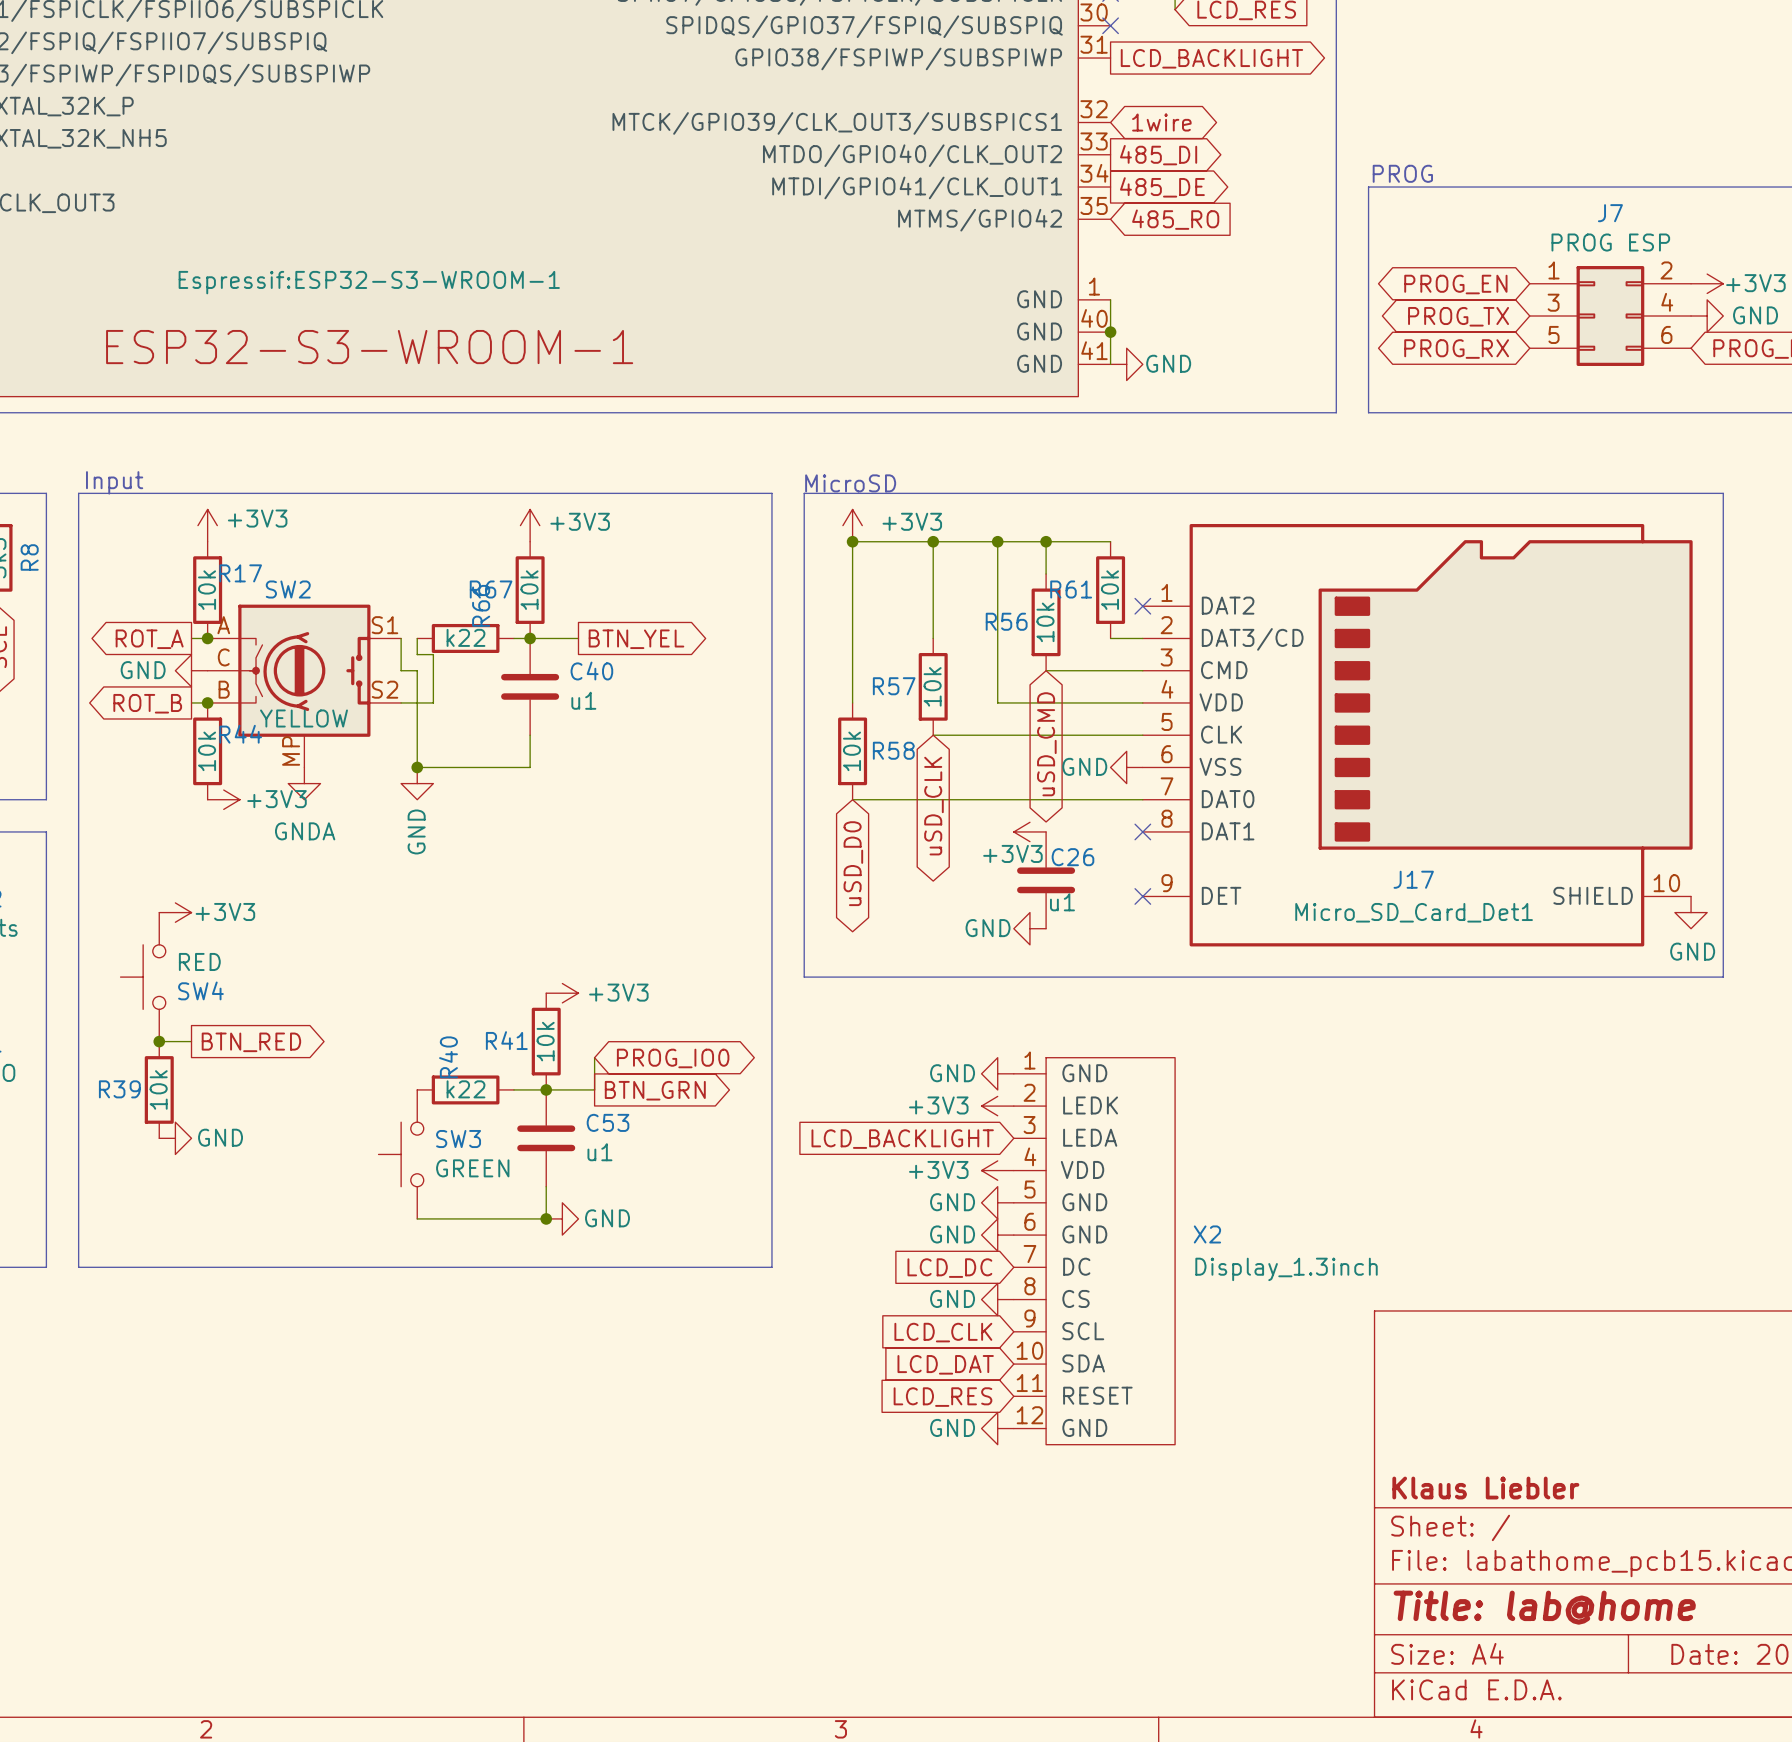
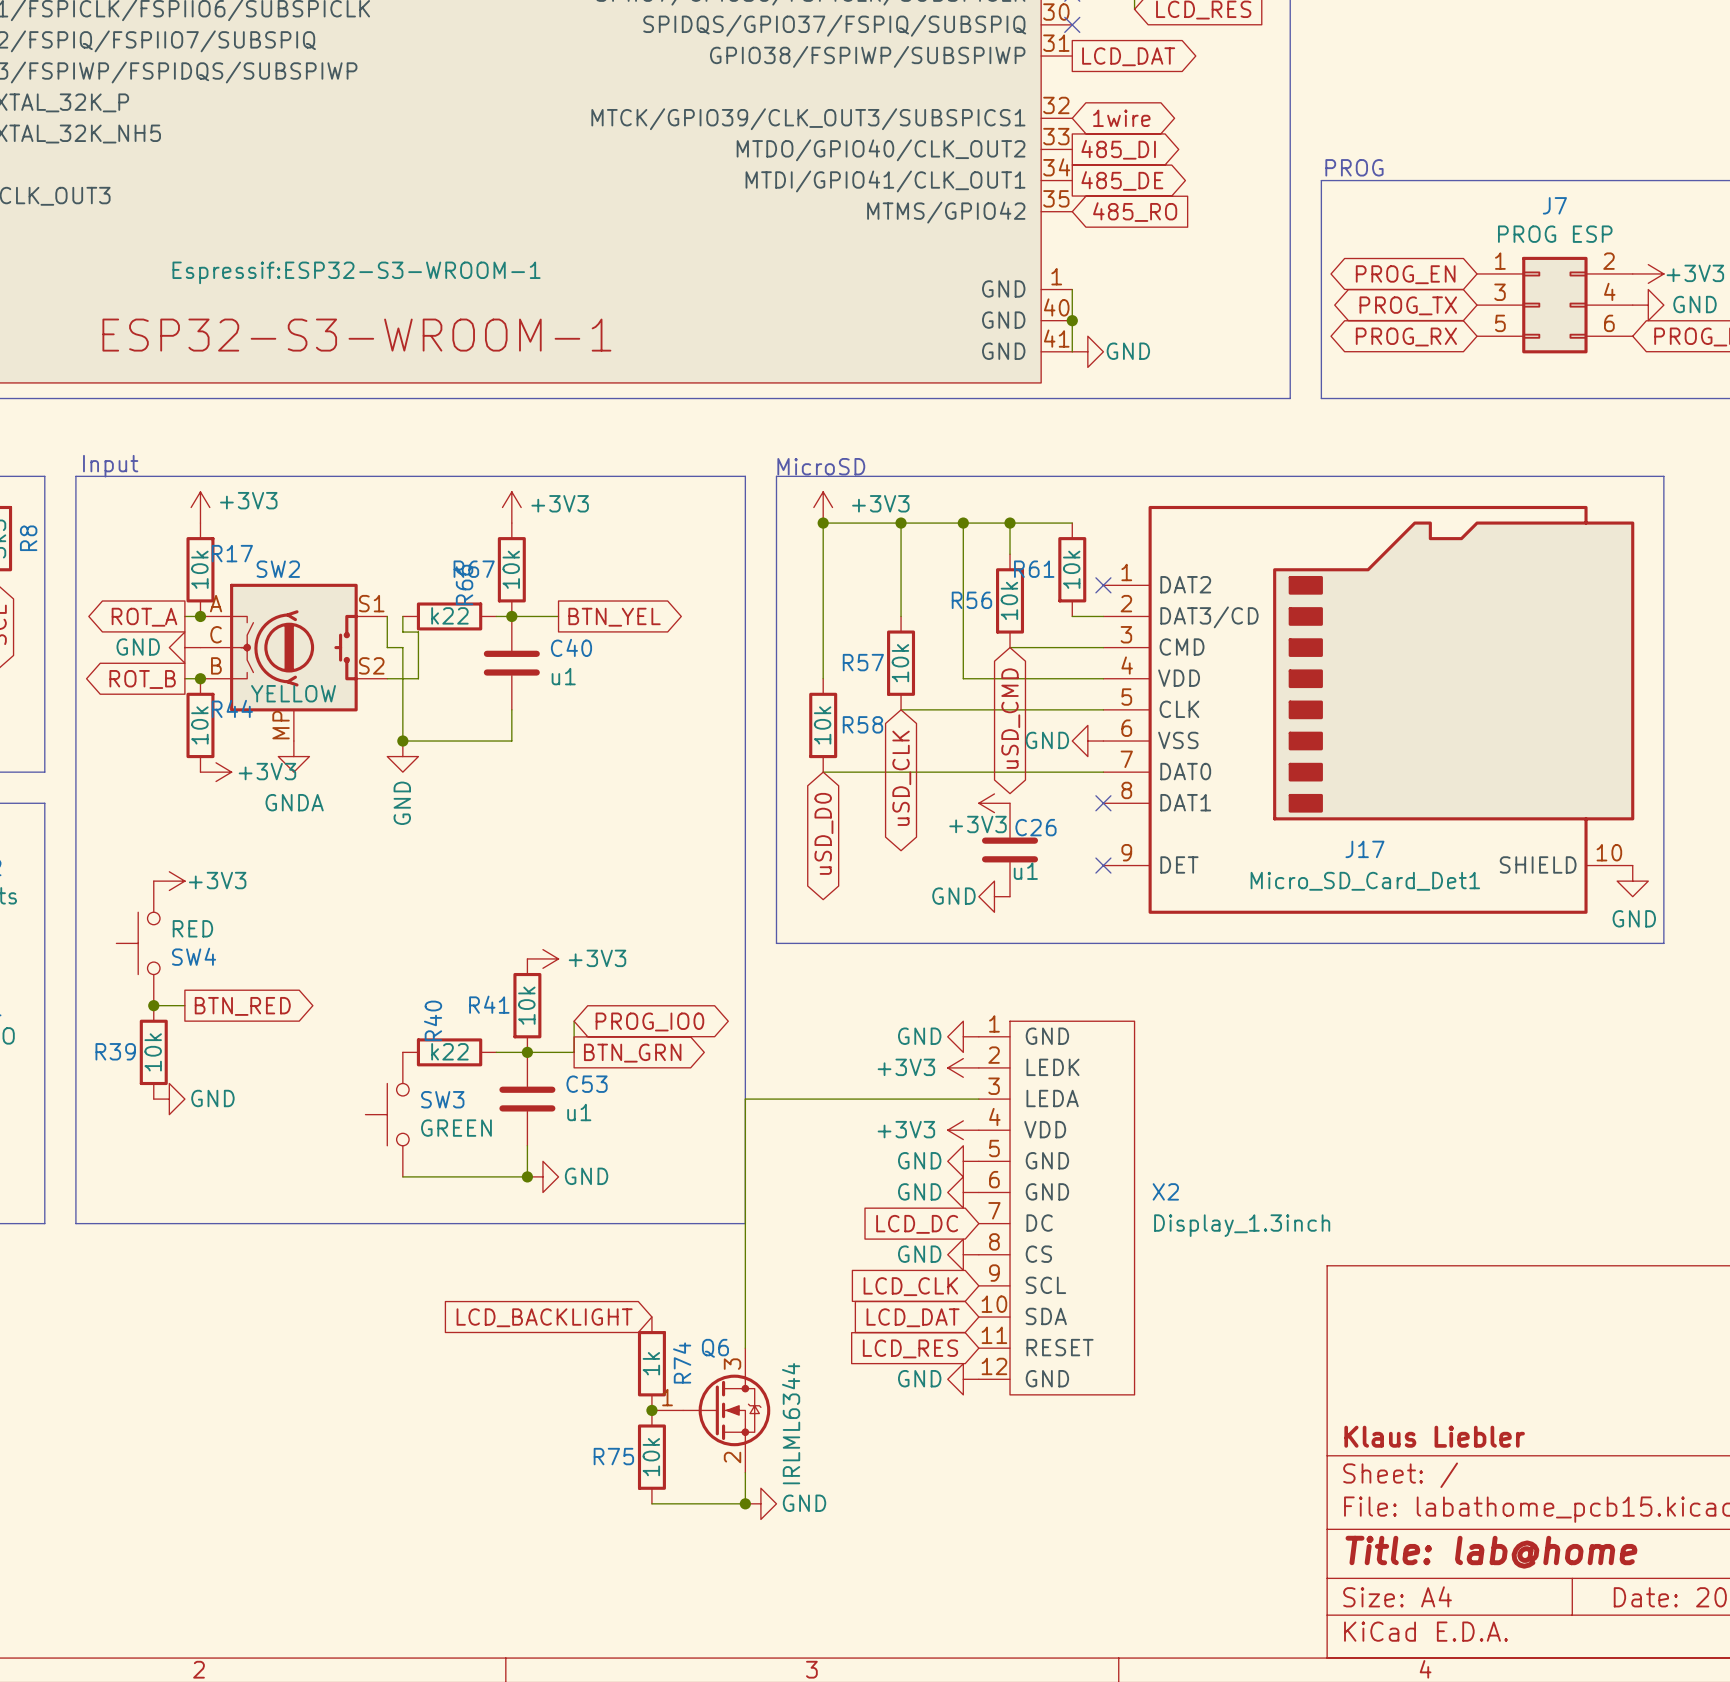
global label: LCD_BACKLIGHT (1211, 58) -> LCD_DAT (1128, 56)
wire: none -> (978, 1099) (745, 1099) (745, 1348)
global label: LCD_BACKLIGHT (902, 1139) -> none
global label: none -> LCD_BACKLIGHT (544, 1317)
R74: none -> 1k (651, 1363)
junction: none -> (651, 1410)
Q6: none -> IRLML6344 (711, 1410)
R75: none -> 10k (651, 1457)
wire: none -> (745, 1472) (745, 1503) (651, 1503)
junction: none -> (745, 1503)
power symbol: none -> GND (760, 1503)

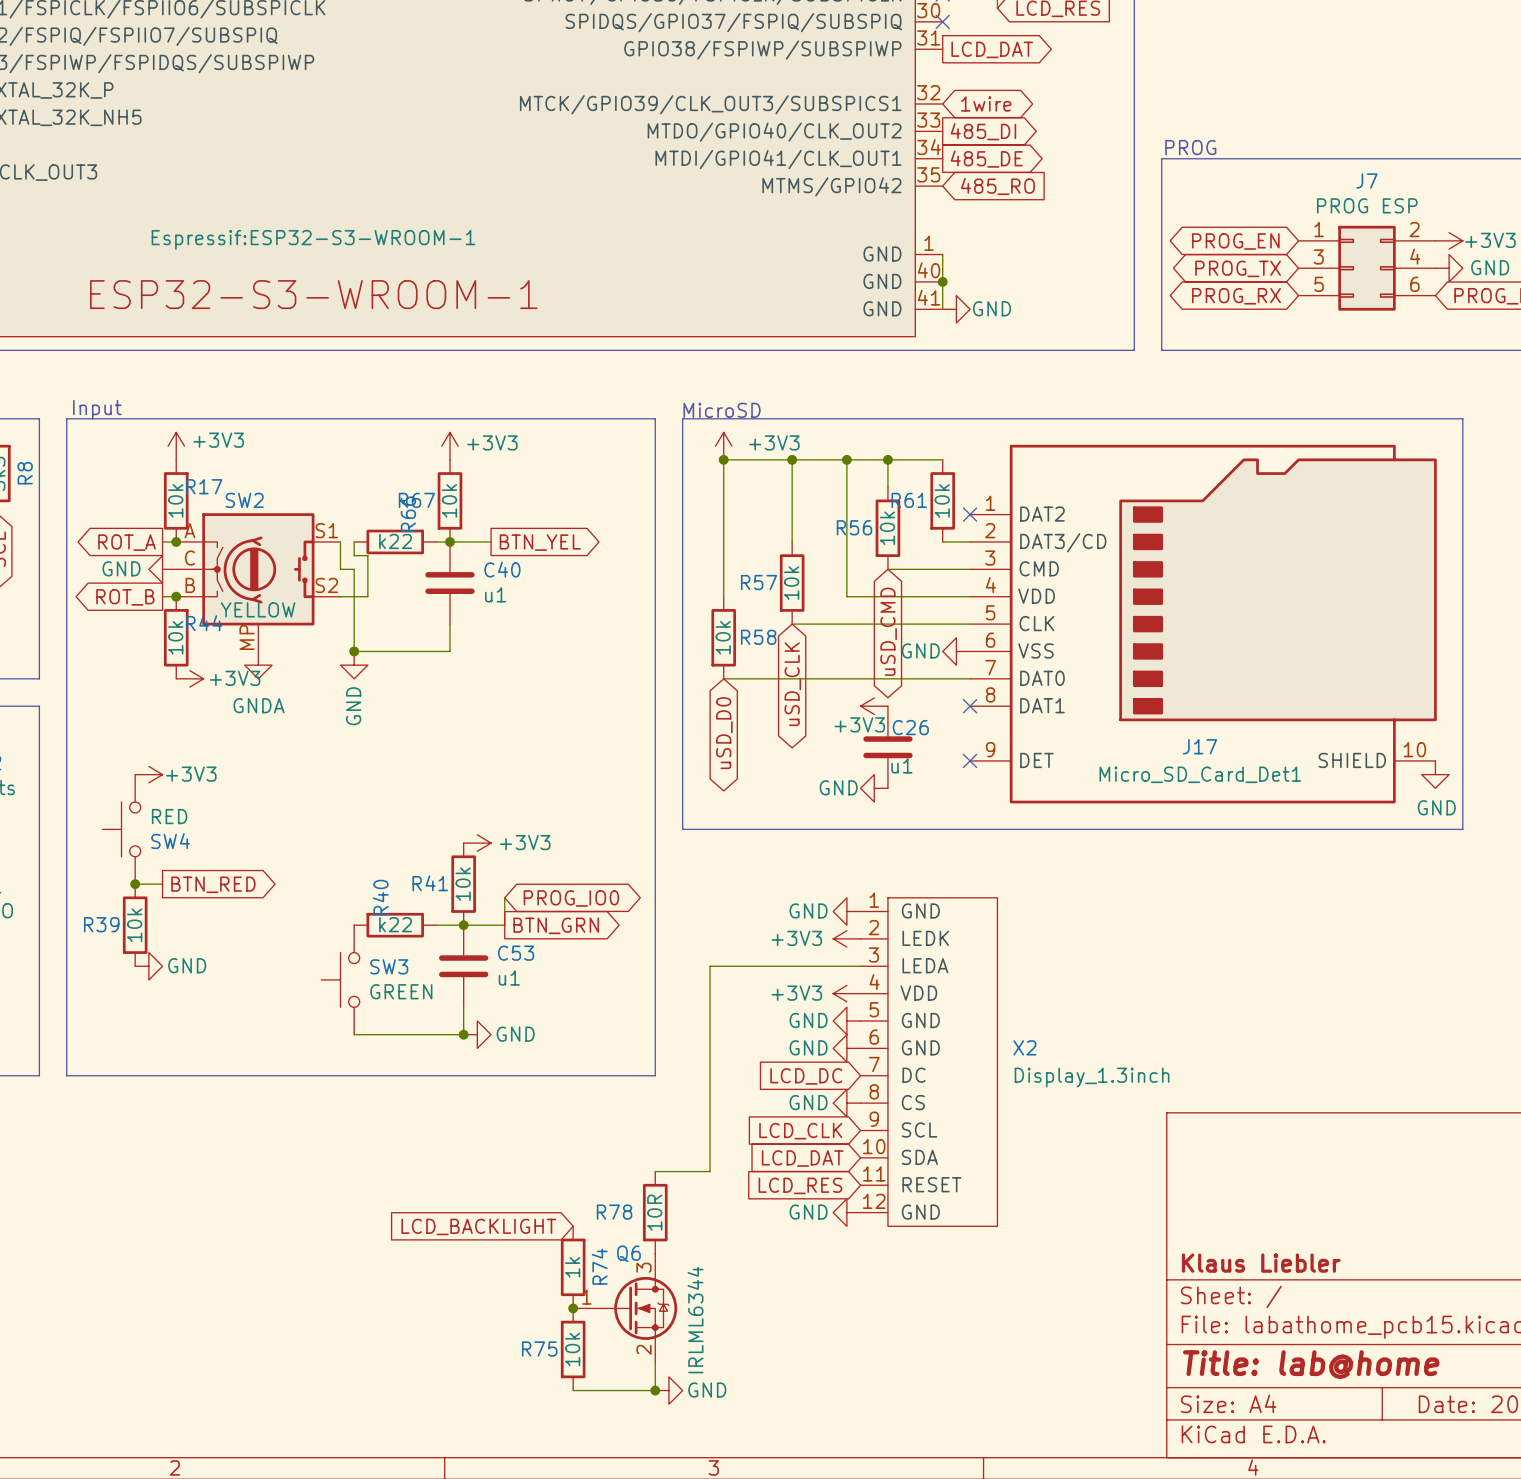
wire: (807, 1099) (745, 1099) (745, 1348) -> (710, 966) (710, 1171) (655, 1171)
global label position: LCD_BACKLIGHT (544, 1317) -> LCD_BACKLIGHT (478, 1226)
R74 position: (651, 1363) -> (573, 1267)
R78: none -> 10R (655, 1212)
junction: (651, 1410) -> none
Q6 position: (711, 1410) -> (625, 1308)
R75 position: (651, 1457) -> (573, 1349)
wire: (745, 1472) (745, 1503) (651, 1503) -> (655, 1363) (655, 1390) (573, 1390)
junction: none -> (573, 1308)
junction: (745, 1503) -> none
power symbol position: GND (760, 1503) -> GND (668, 1390)
junction: none -> (655, 1390)

